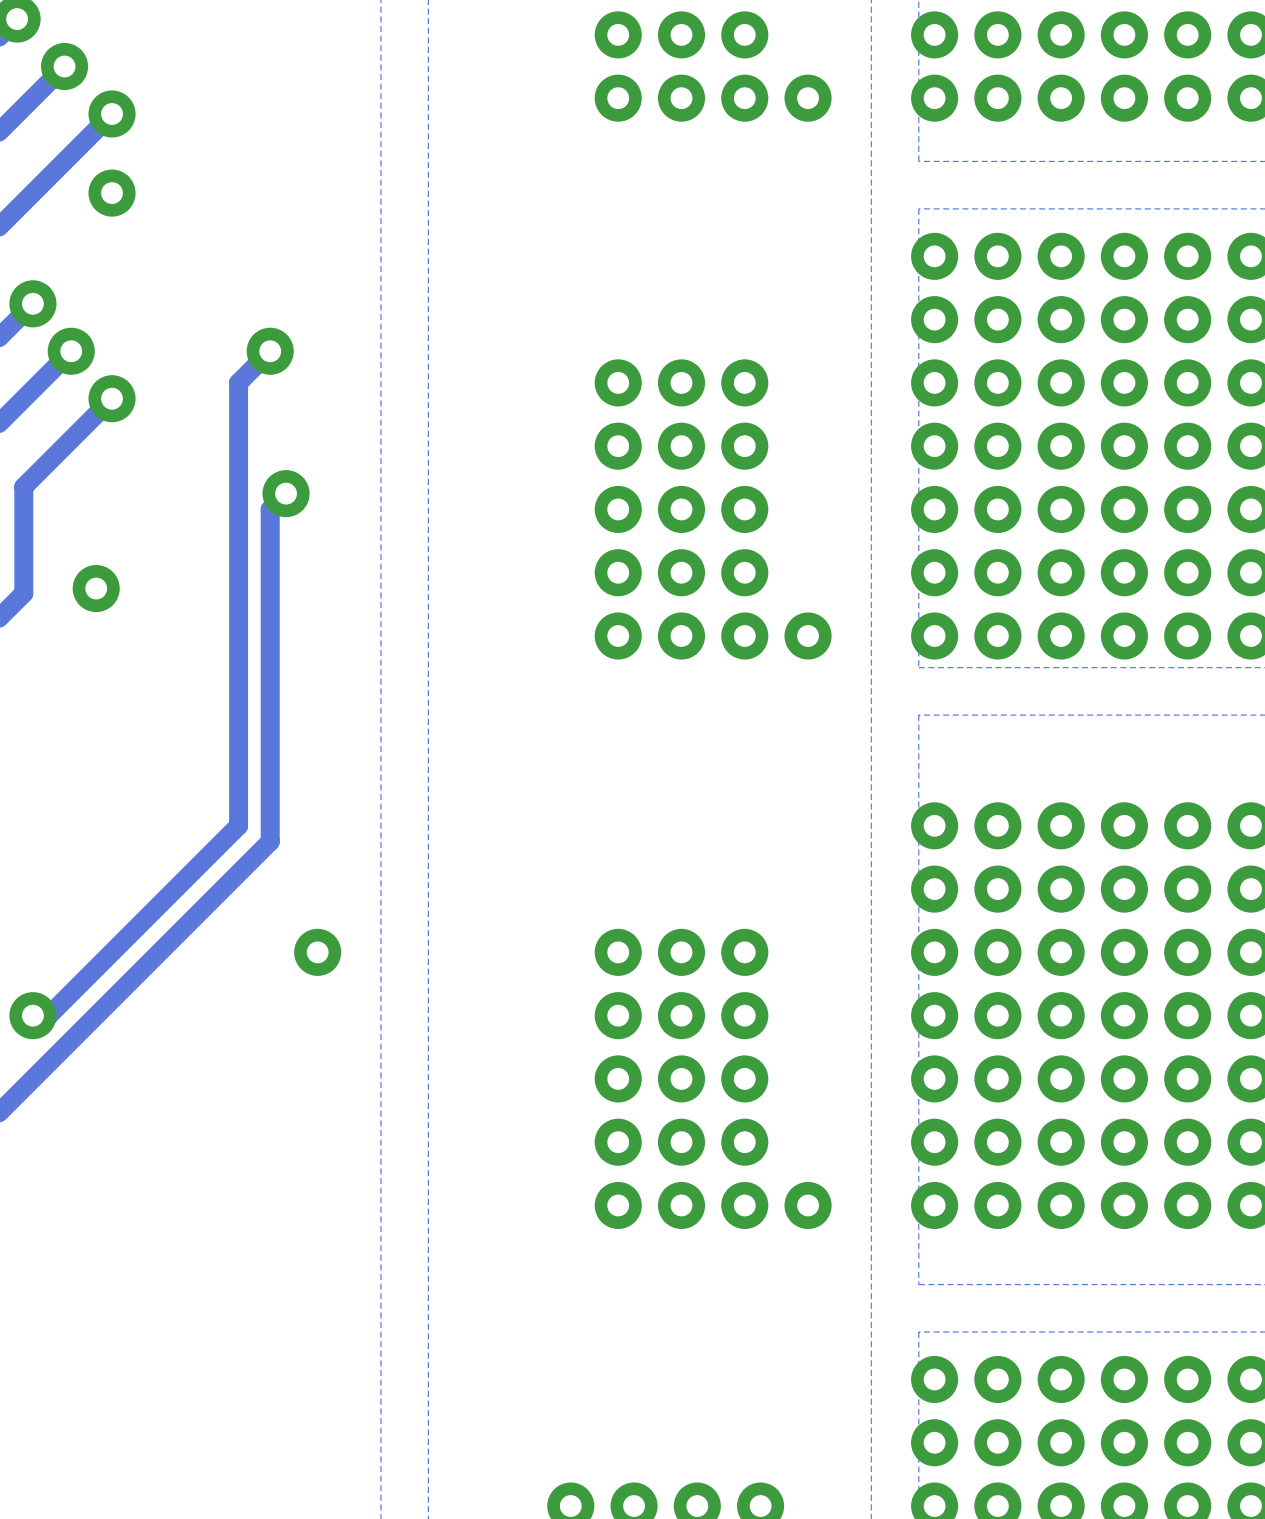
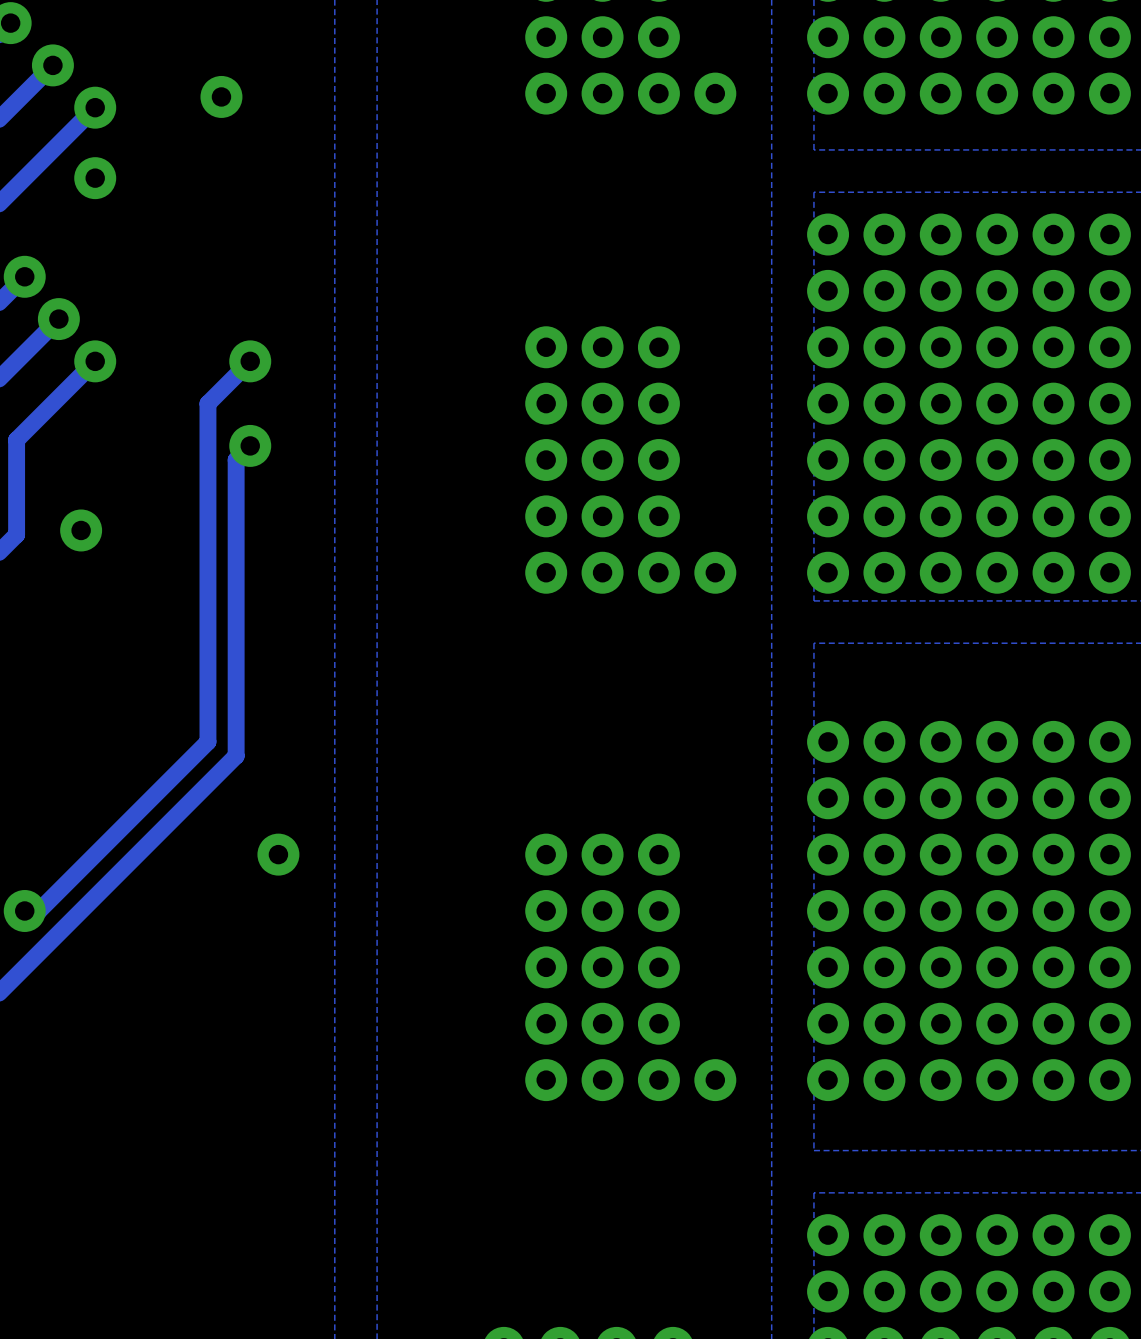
via: none -> (221, 96)
track: (270, 351) (238, 382) (238, 446) -> (250, 361) (207, 403)
via position: (270, 351) -> (250, 361)

